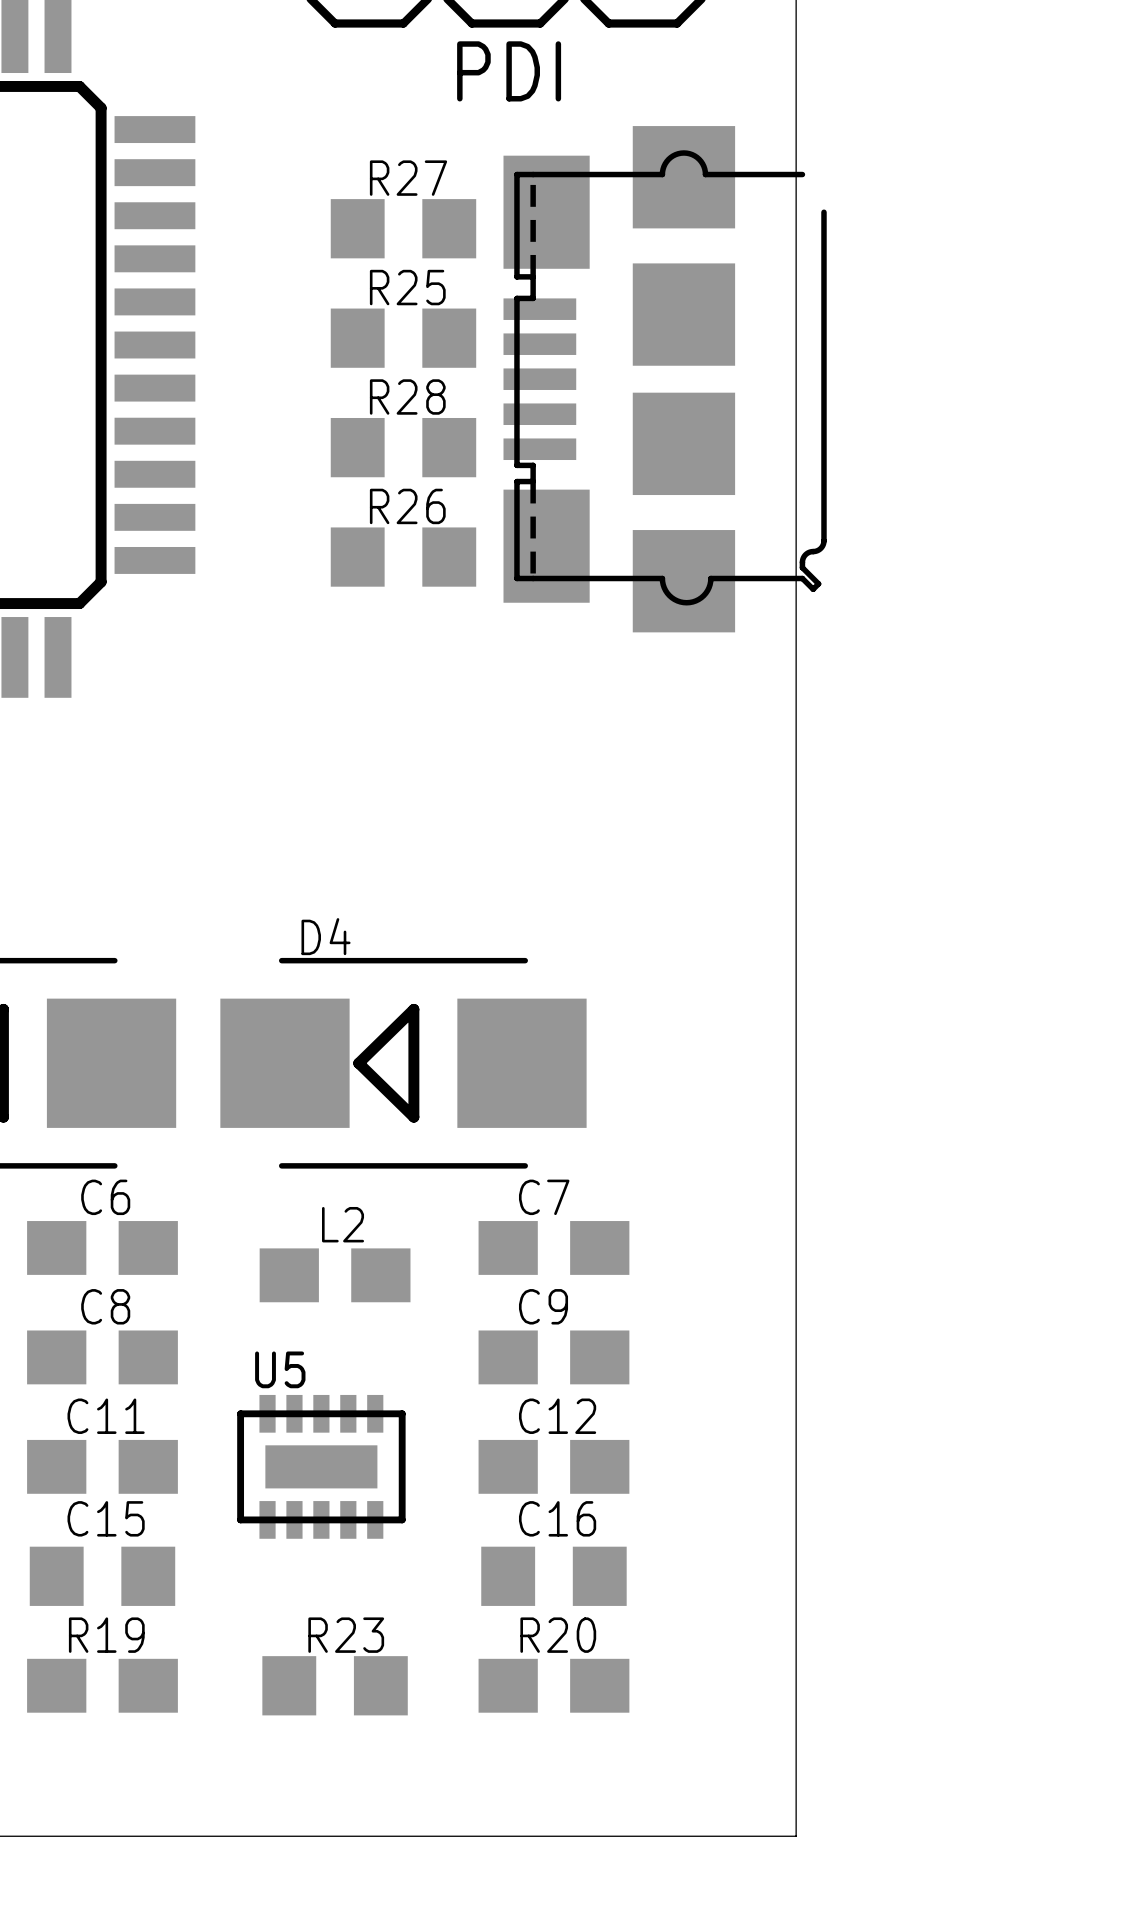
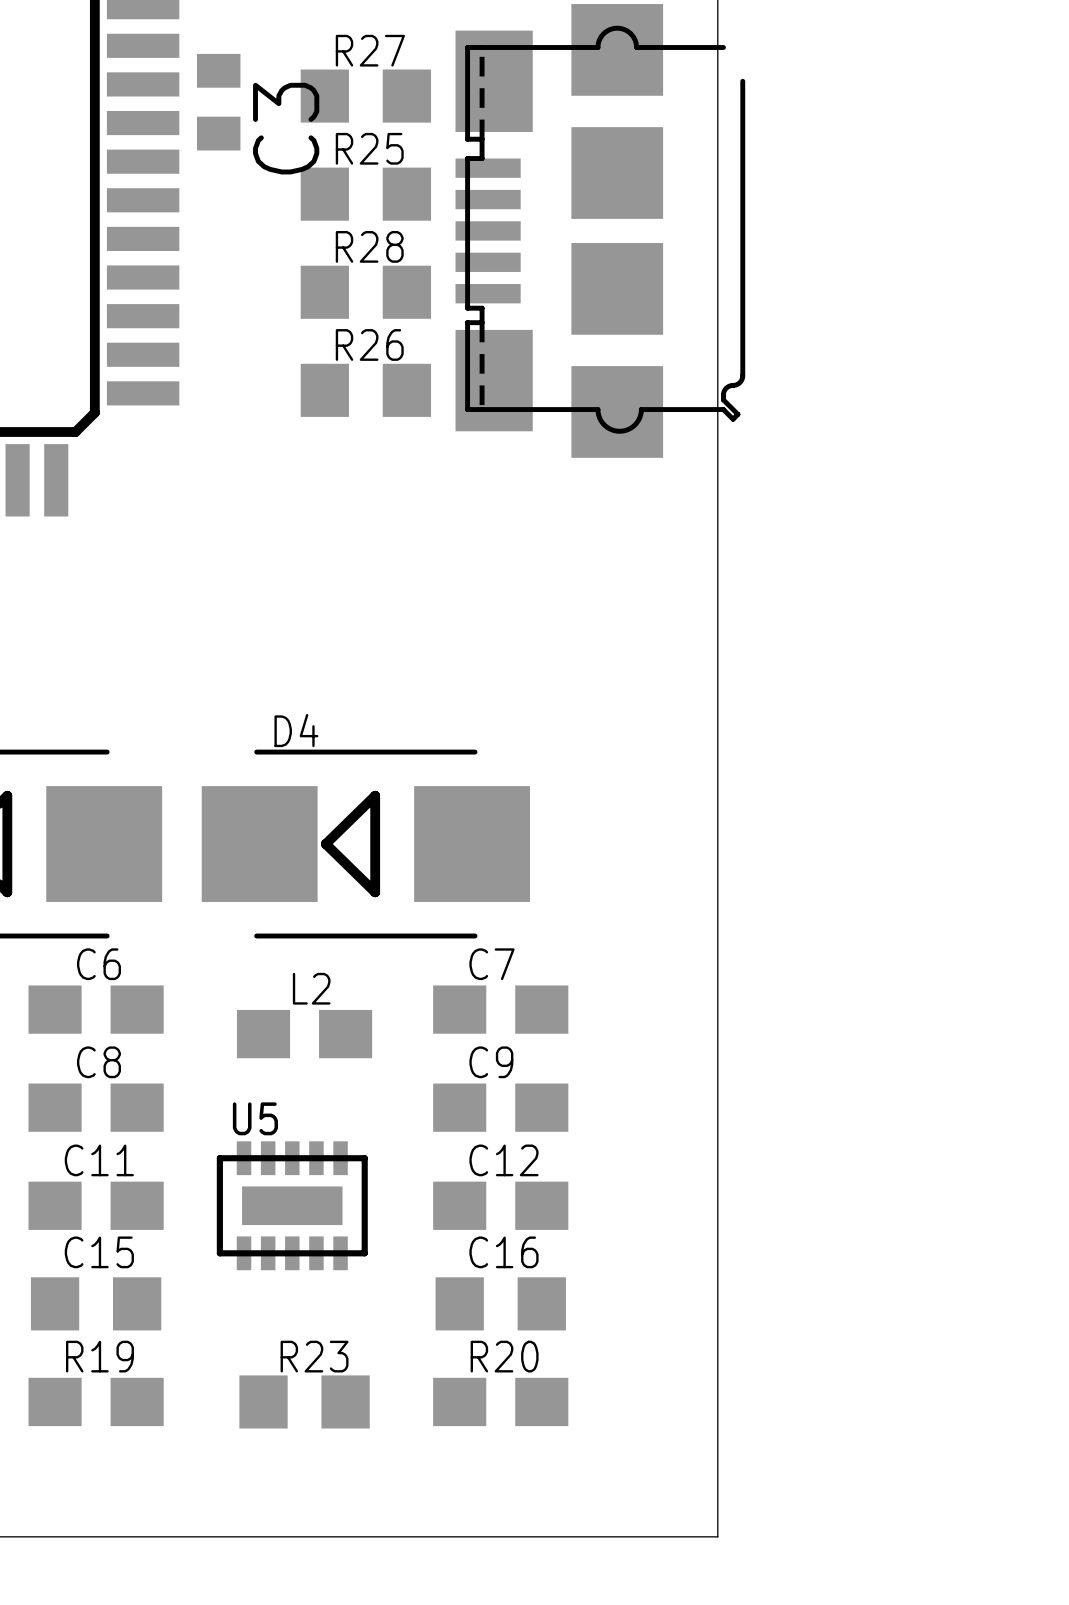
C3: none -> (218, 102)

